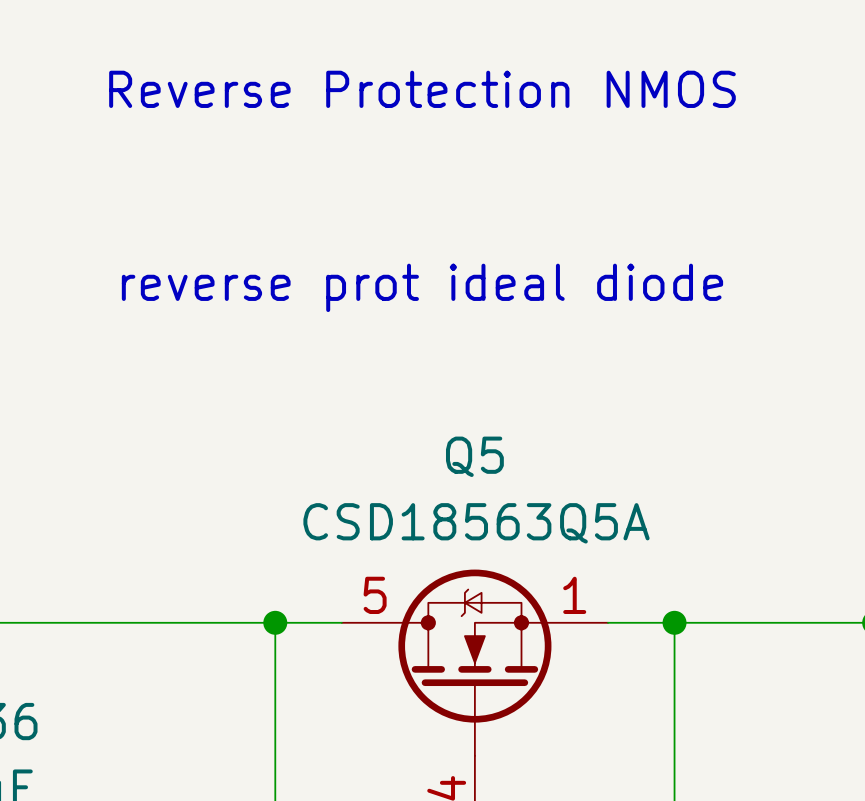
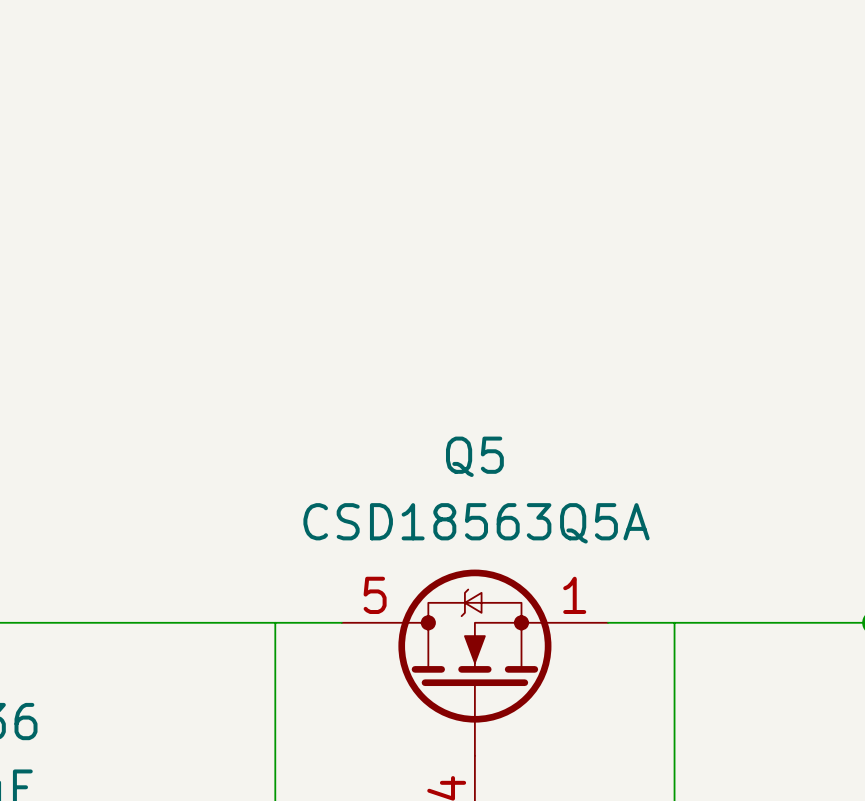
text: Reverse Protection NMOS (422, 89) -> none
text: reverse prot ideal diode (422, 287) -> none
junction: (275, 622) -> none
junction: (674, 622) -> none

